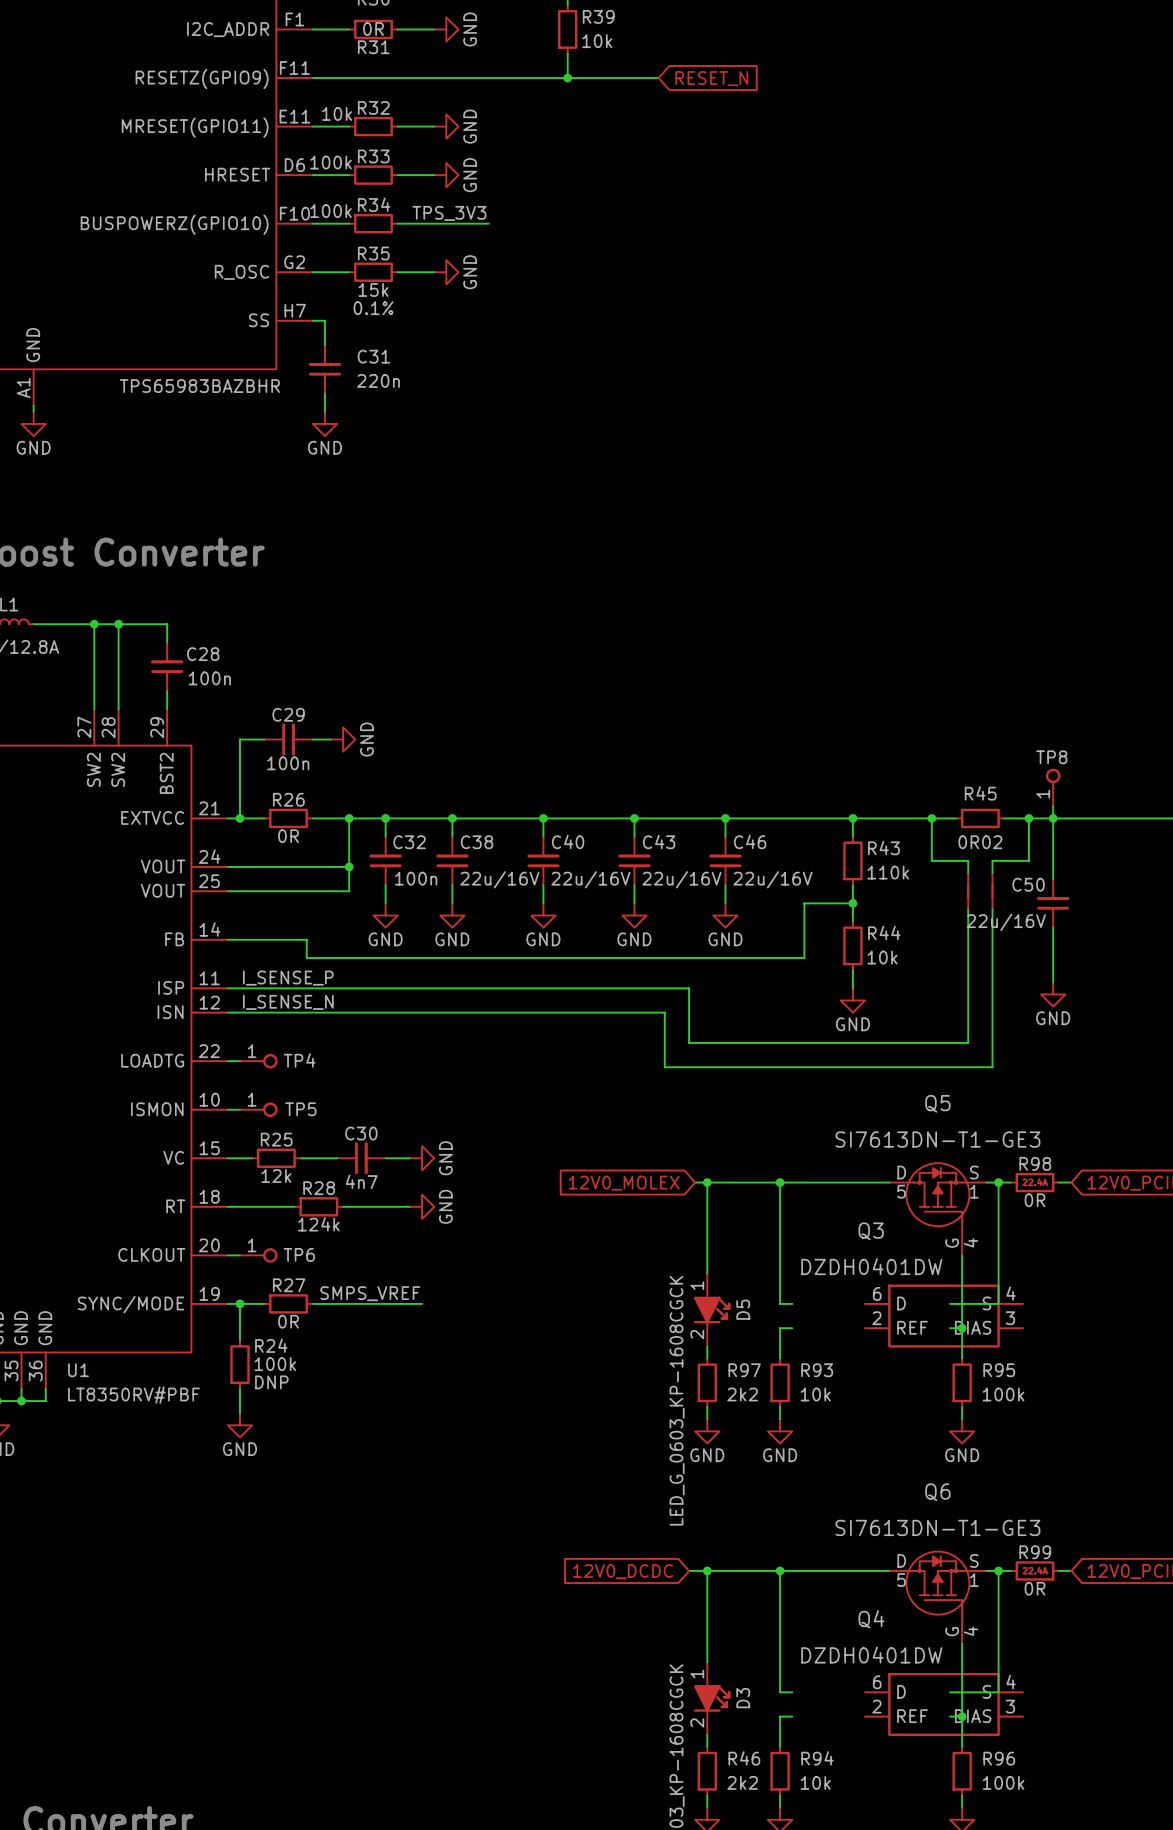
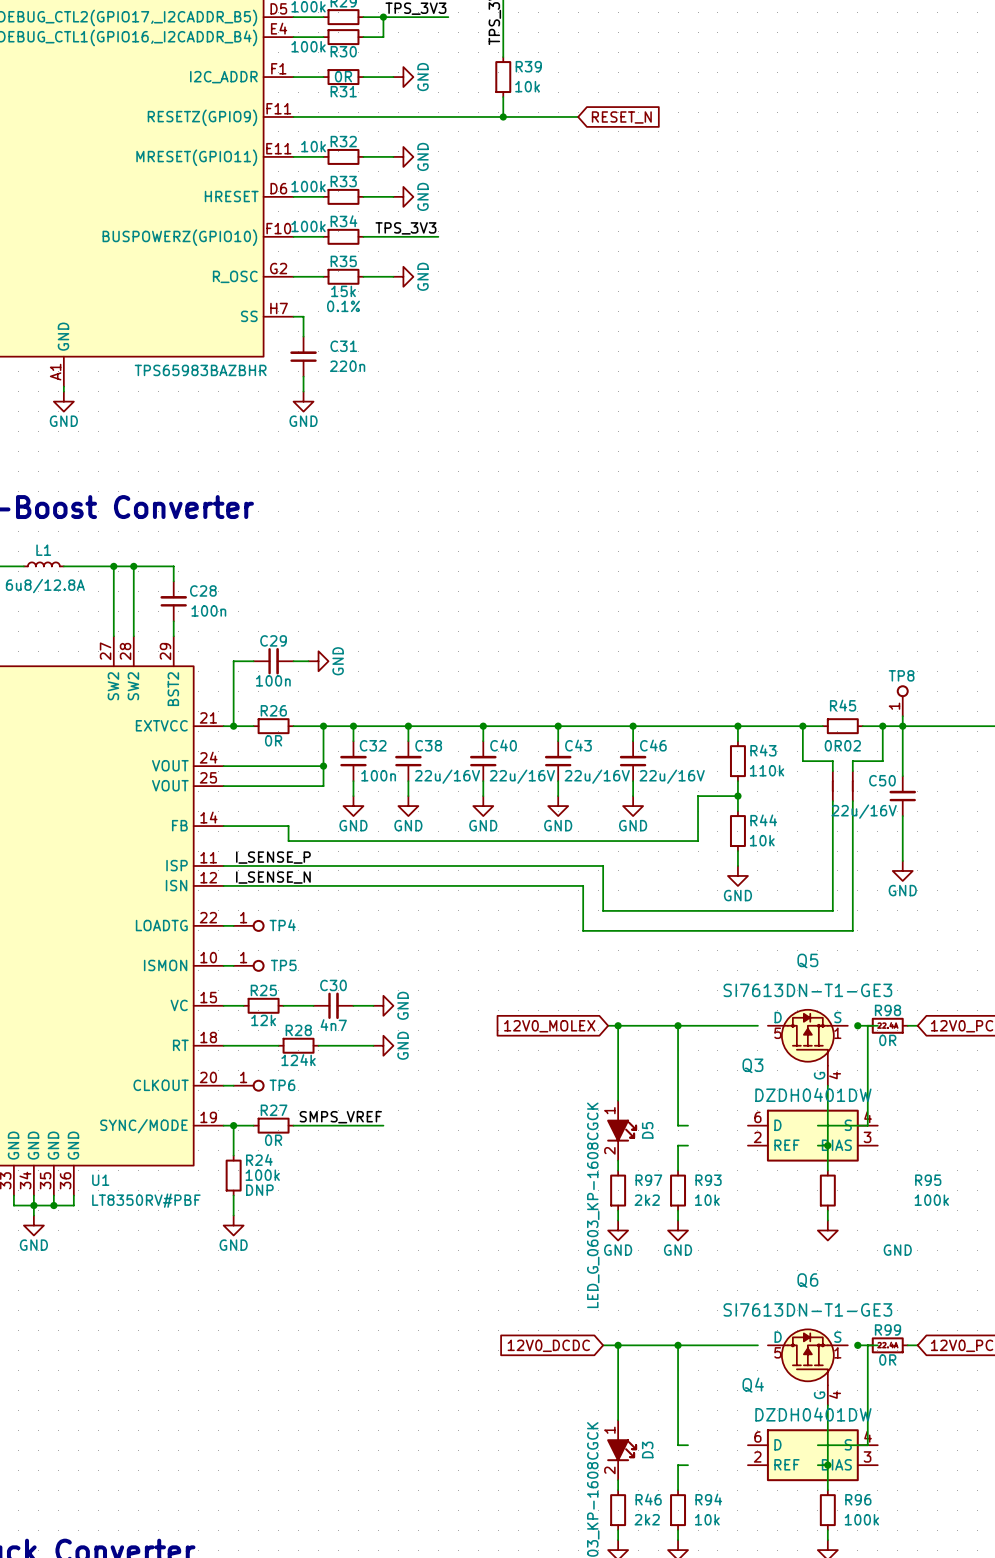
wire: (877, 1182) (889, 1182) -> none
wire: (986, 1182) (998, 1182) (998, 1303) -> (877, 1025) (867, 1025) (867, 1125) (857, 1125)
Q3 value position: DZDH0401DW (871, 1266) -> DZDH0401DW (813, 1094)
R95 name position: R95 (999, 1370) -> R95 (928, 1180)
R95 text position: 100k (1003, 1394) -> 100k (931, 1200)
power symbol text position: GND (962, 1455) -> GND (897, 1250)
wire: (877, 1570) (889, 1570) -> none
wire: (986, 1570) (998, 1570) (998, 1692) -> (877, 1345) (867, 1345) (867, 1445) (857, 1445)
Q4 value position: DZDH0401DW (871, 1655) -> DZDH0401DW (813, 1414)

